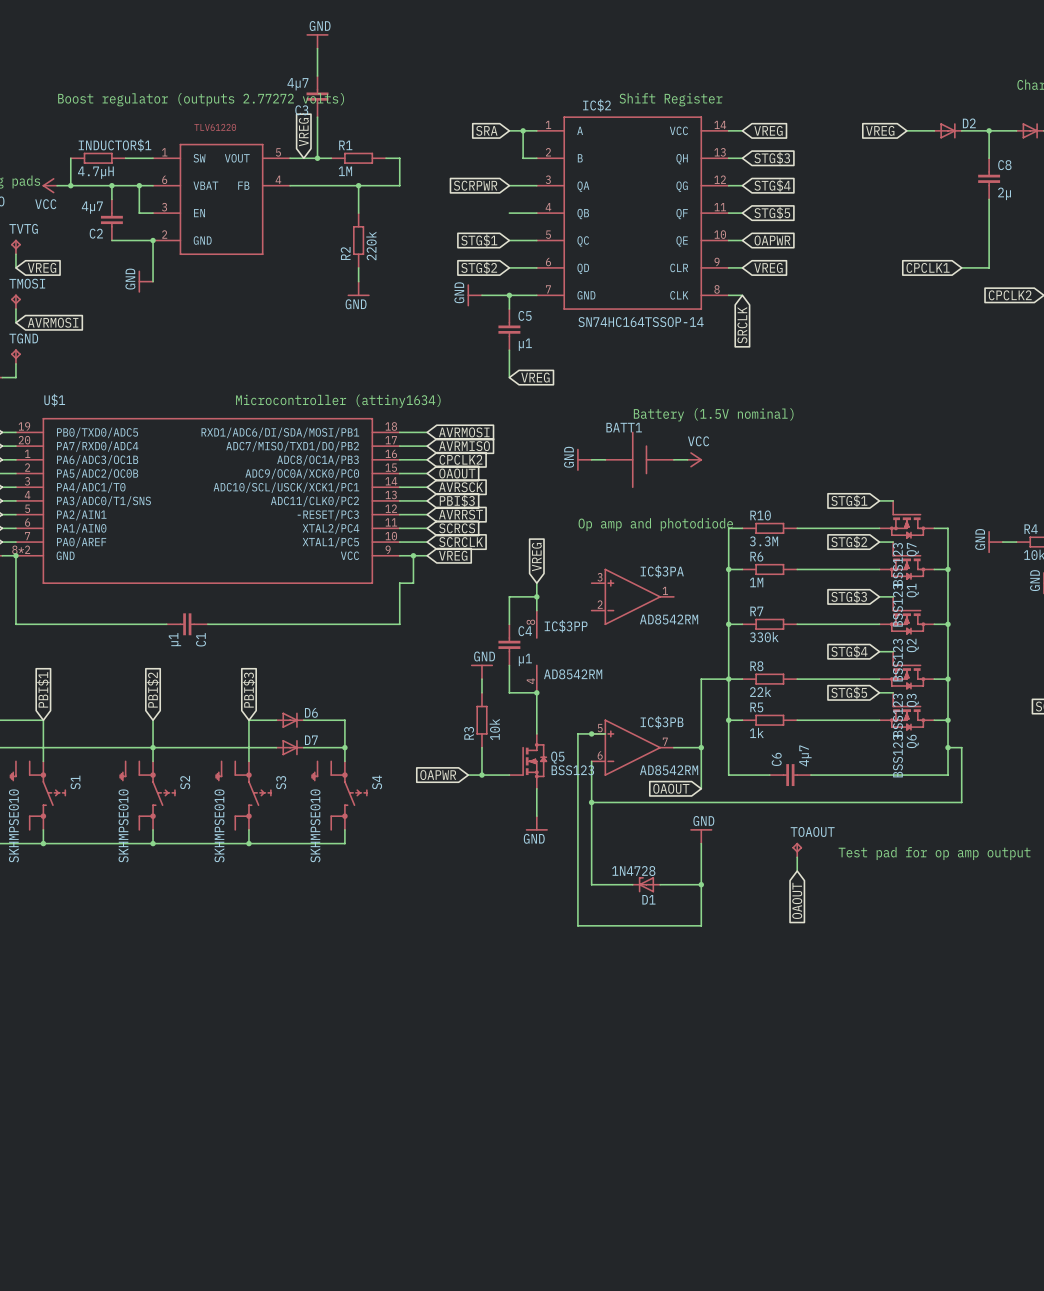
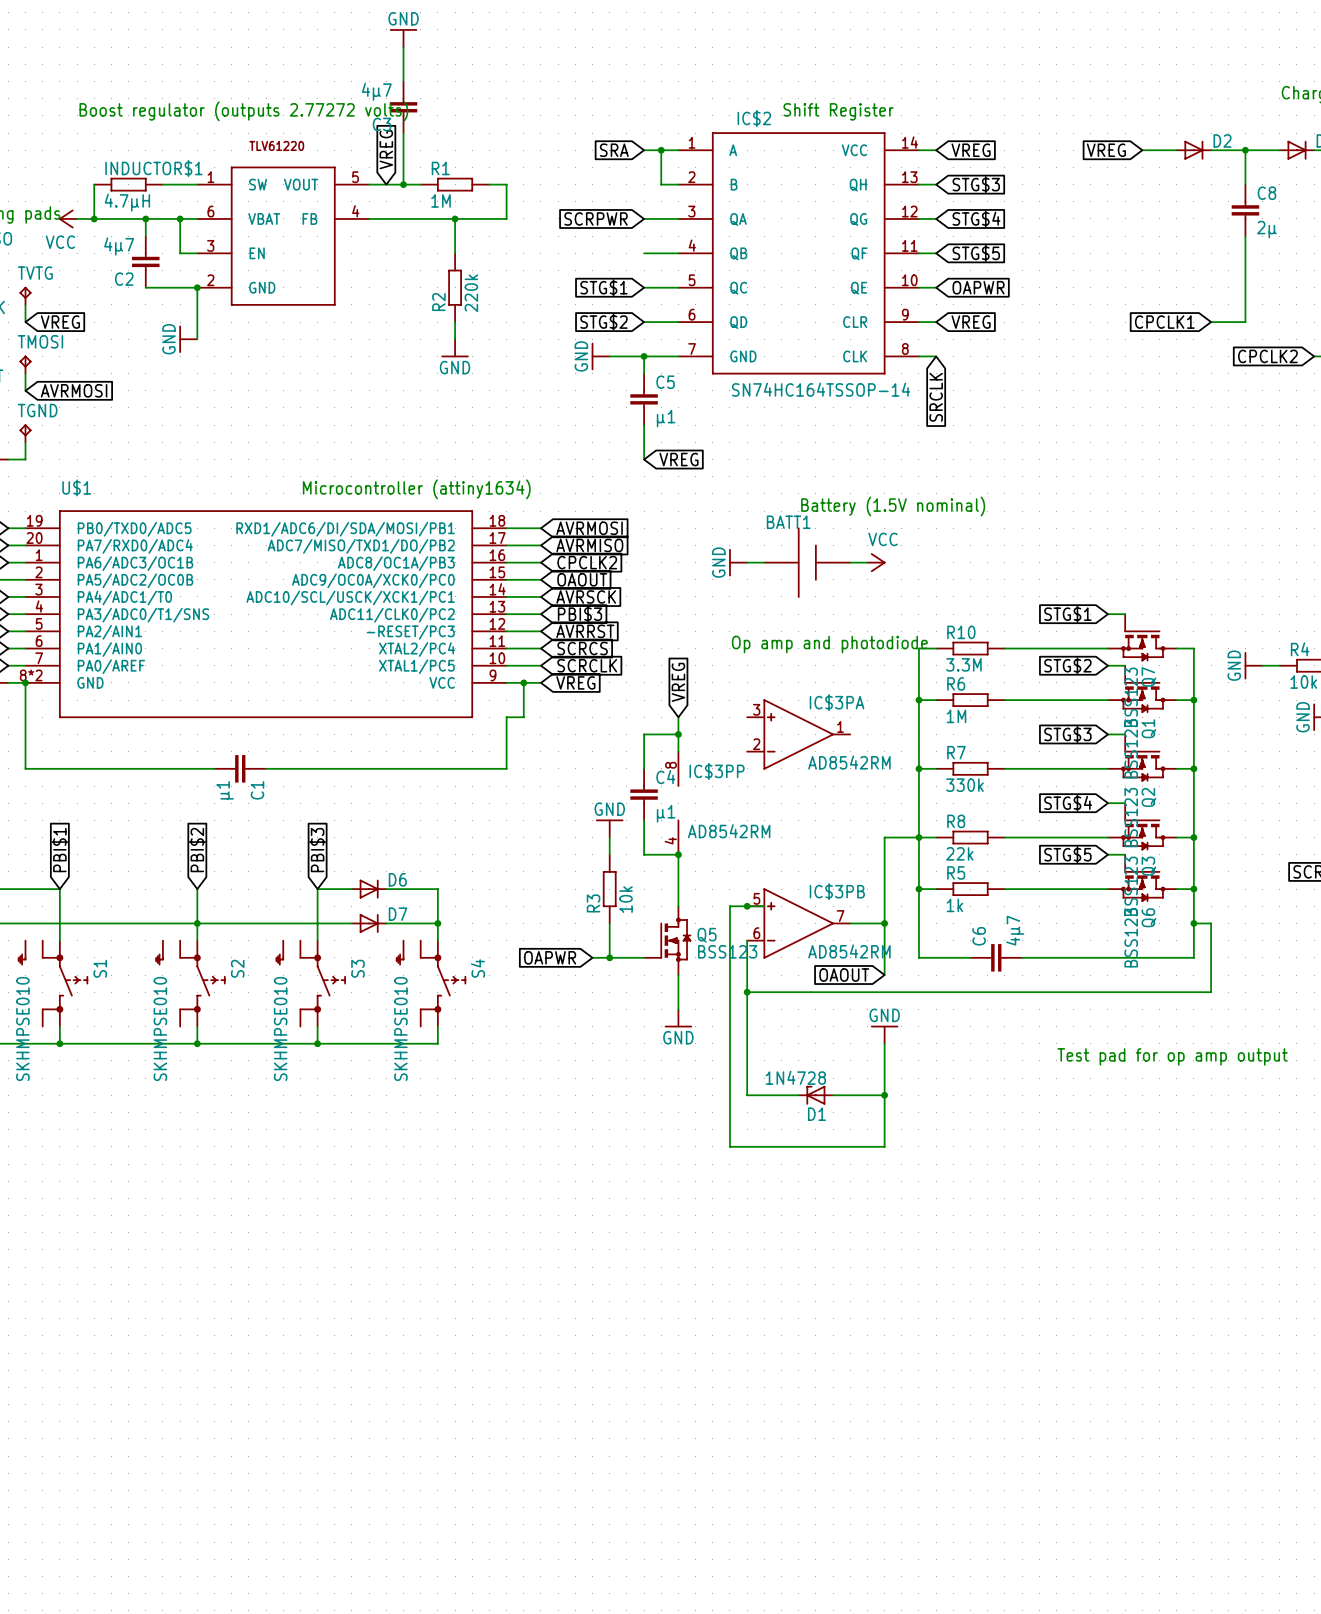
TOAOUT: (797, 850) -> none
wire: (797, 857) (797, 871) -> none
global label: OAOUT (797, 900) -> none

